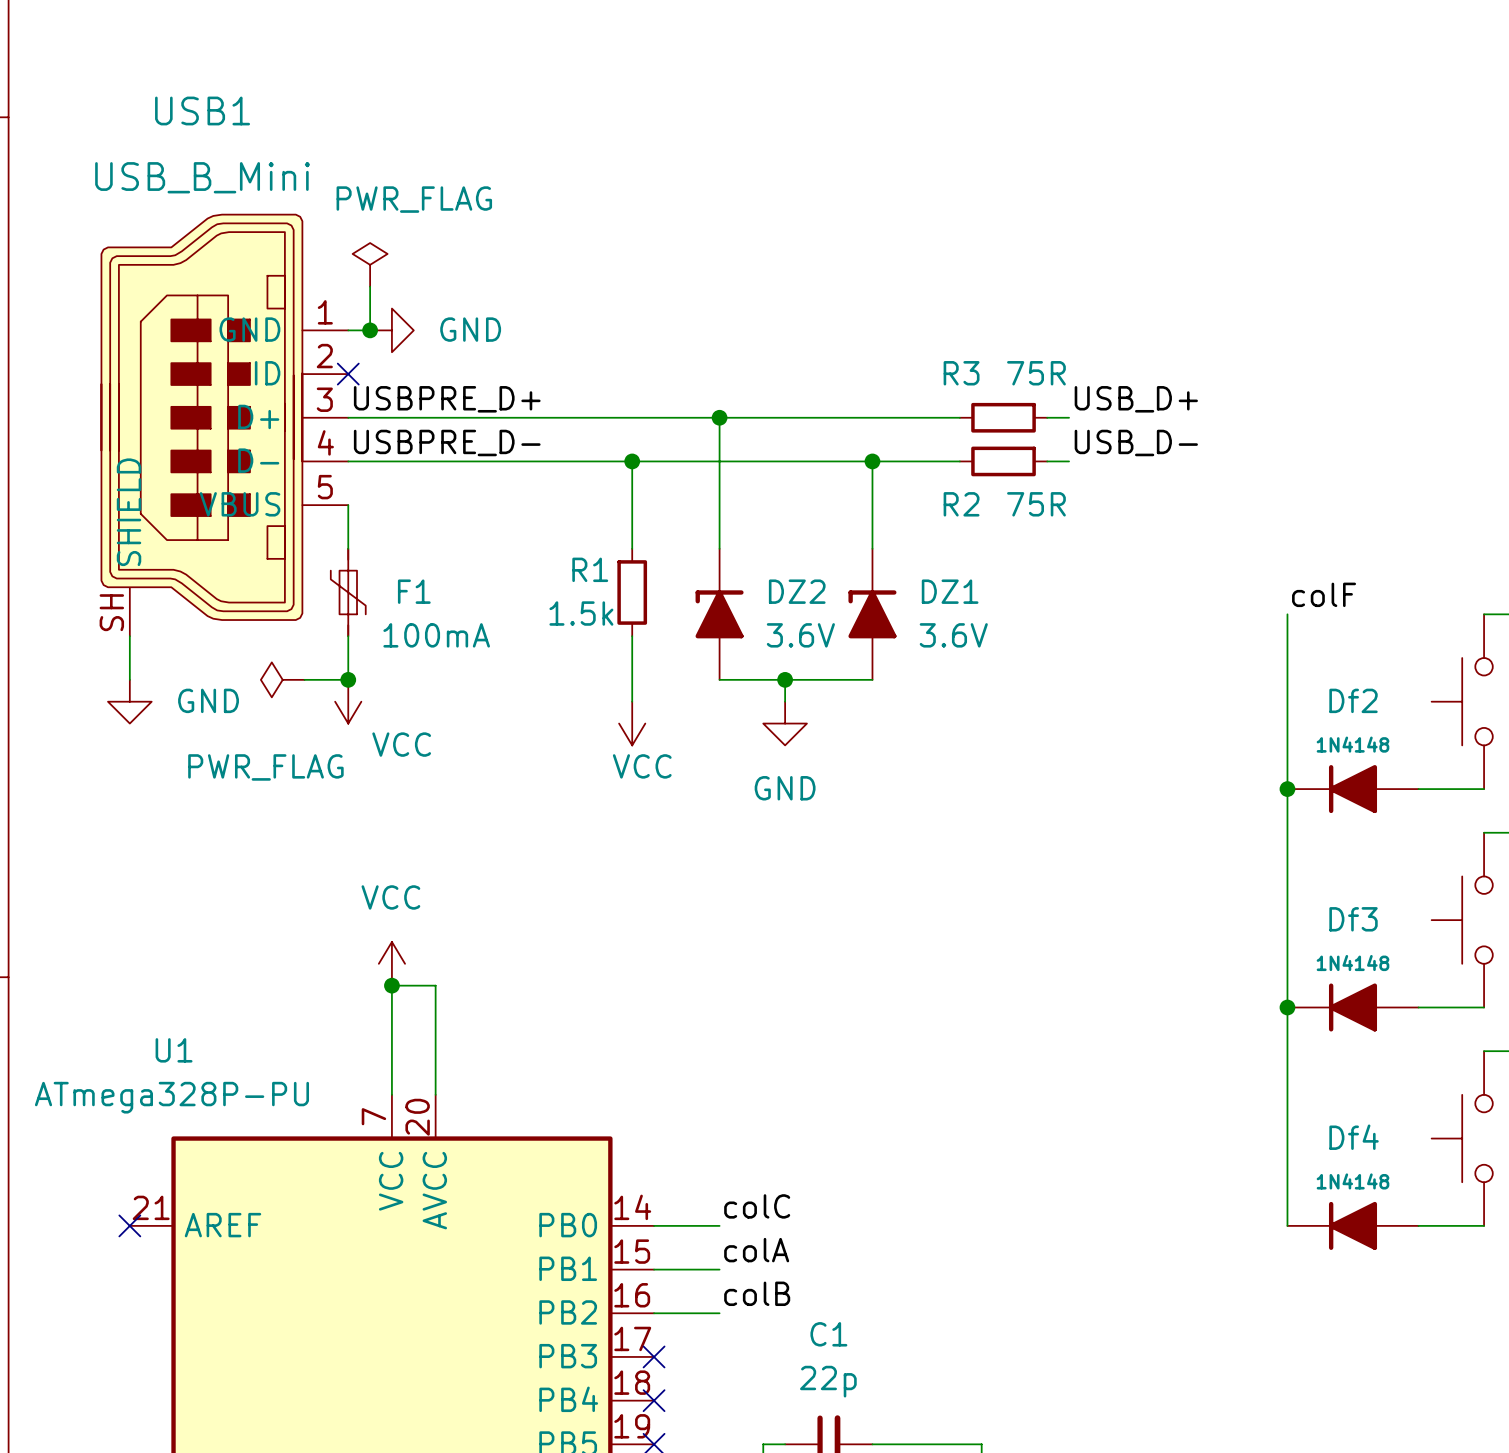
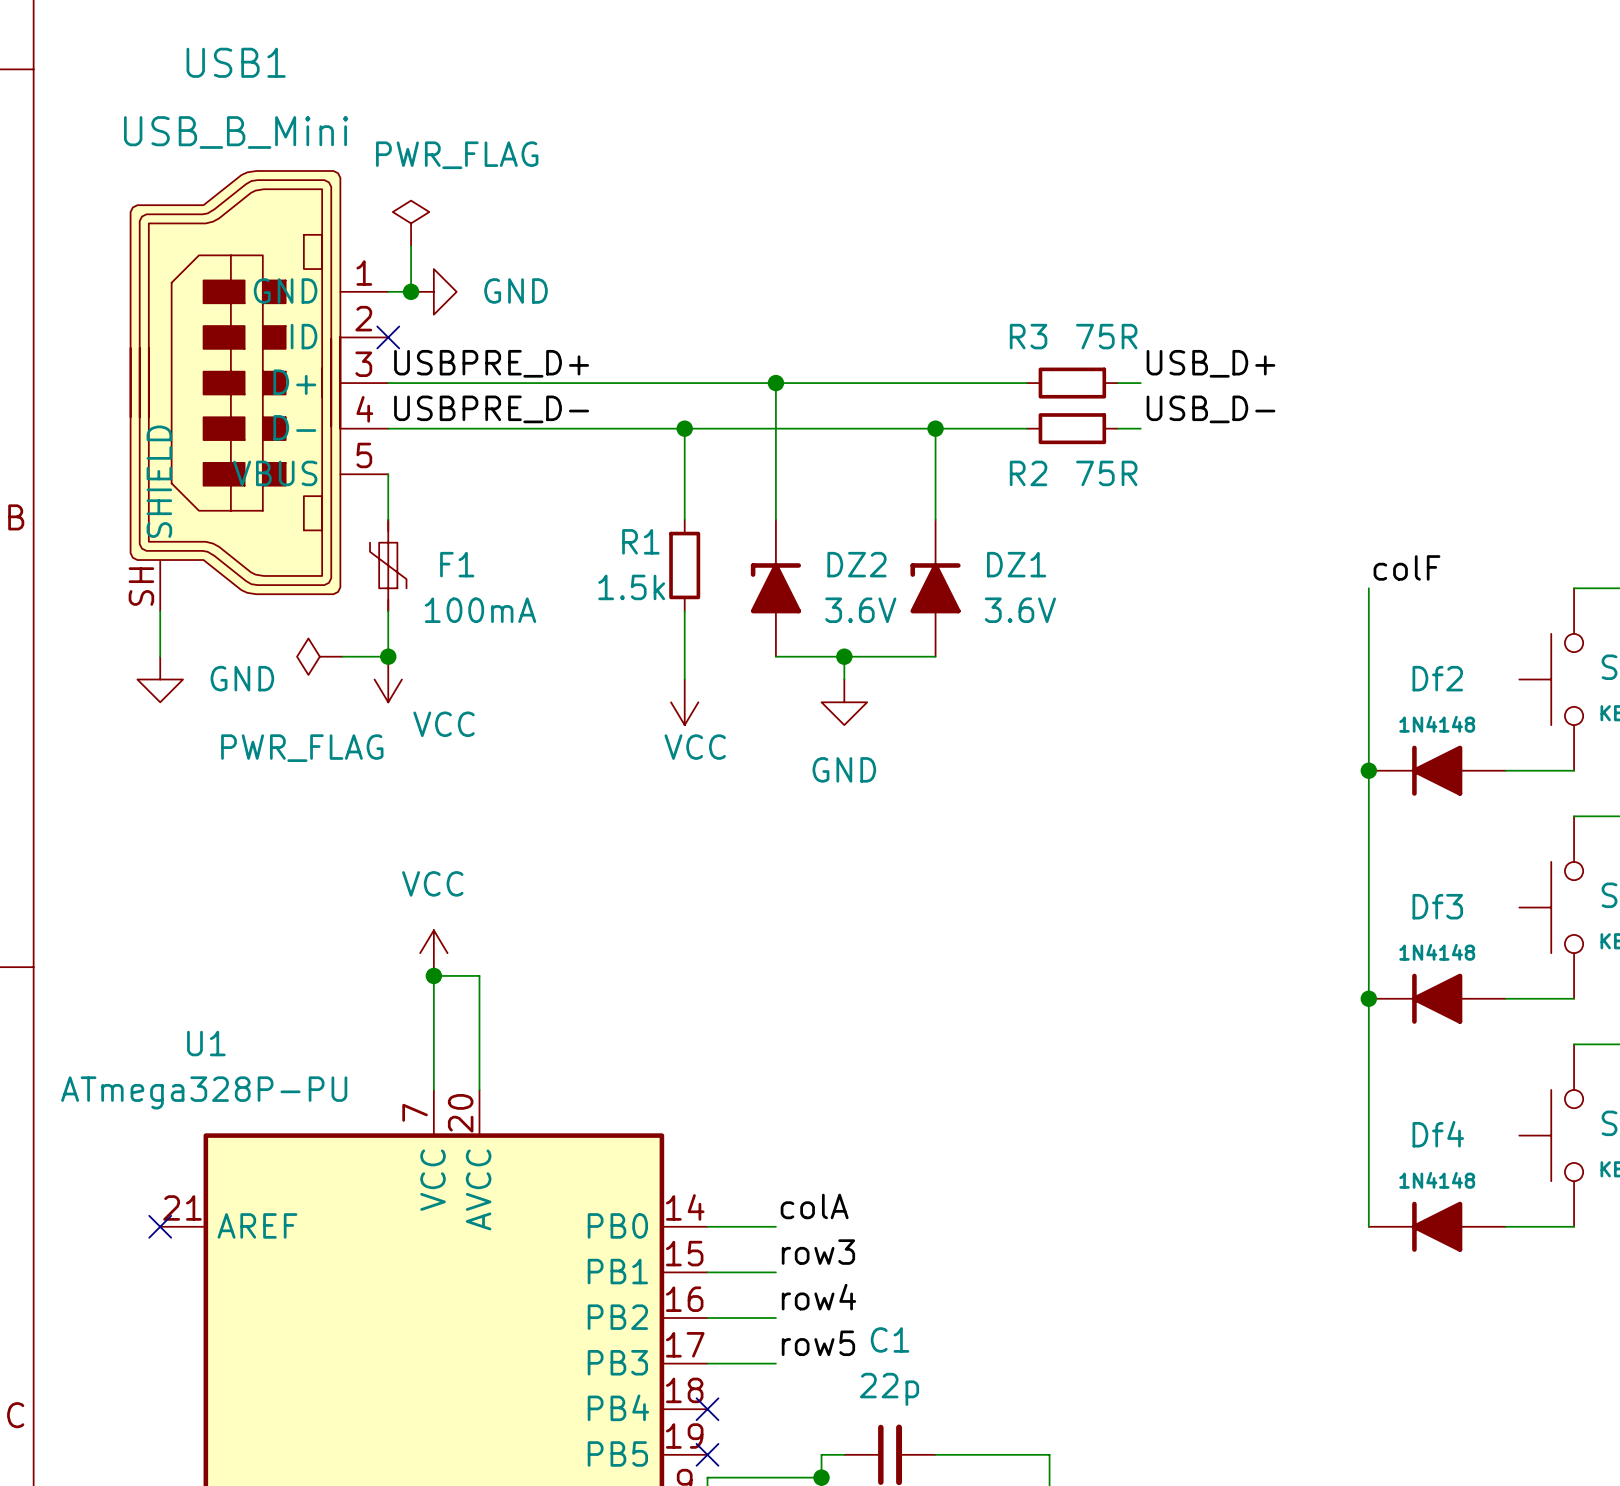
label: colC (757, 1206) -> colA (814, 1206)
label: colA (756, 1250) -> row3 (818, 1252)
label: colB (757, 1293) -> row4 (818, 1297)
label: none -> row5 (818, 1343)
wire: none -> (707, 1363) (775, 1363)
no-connect mark: (654, 1356) -> none

